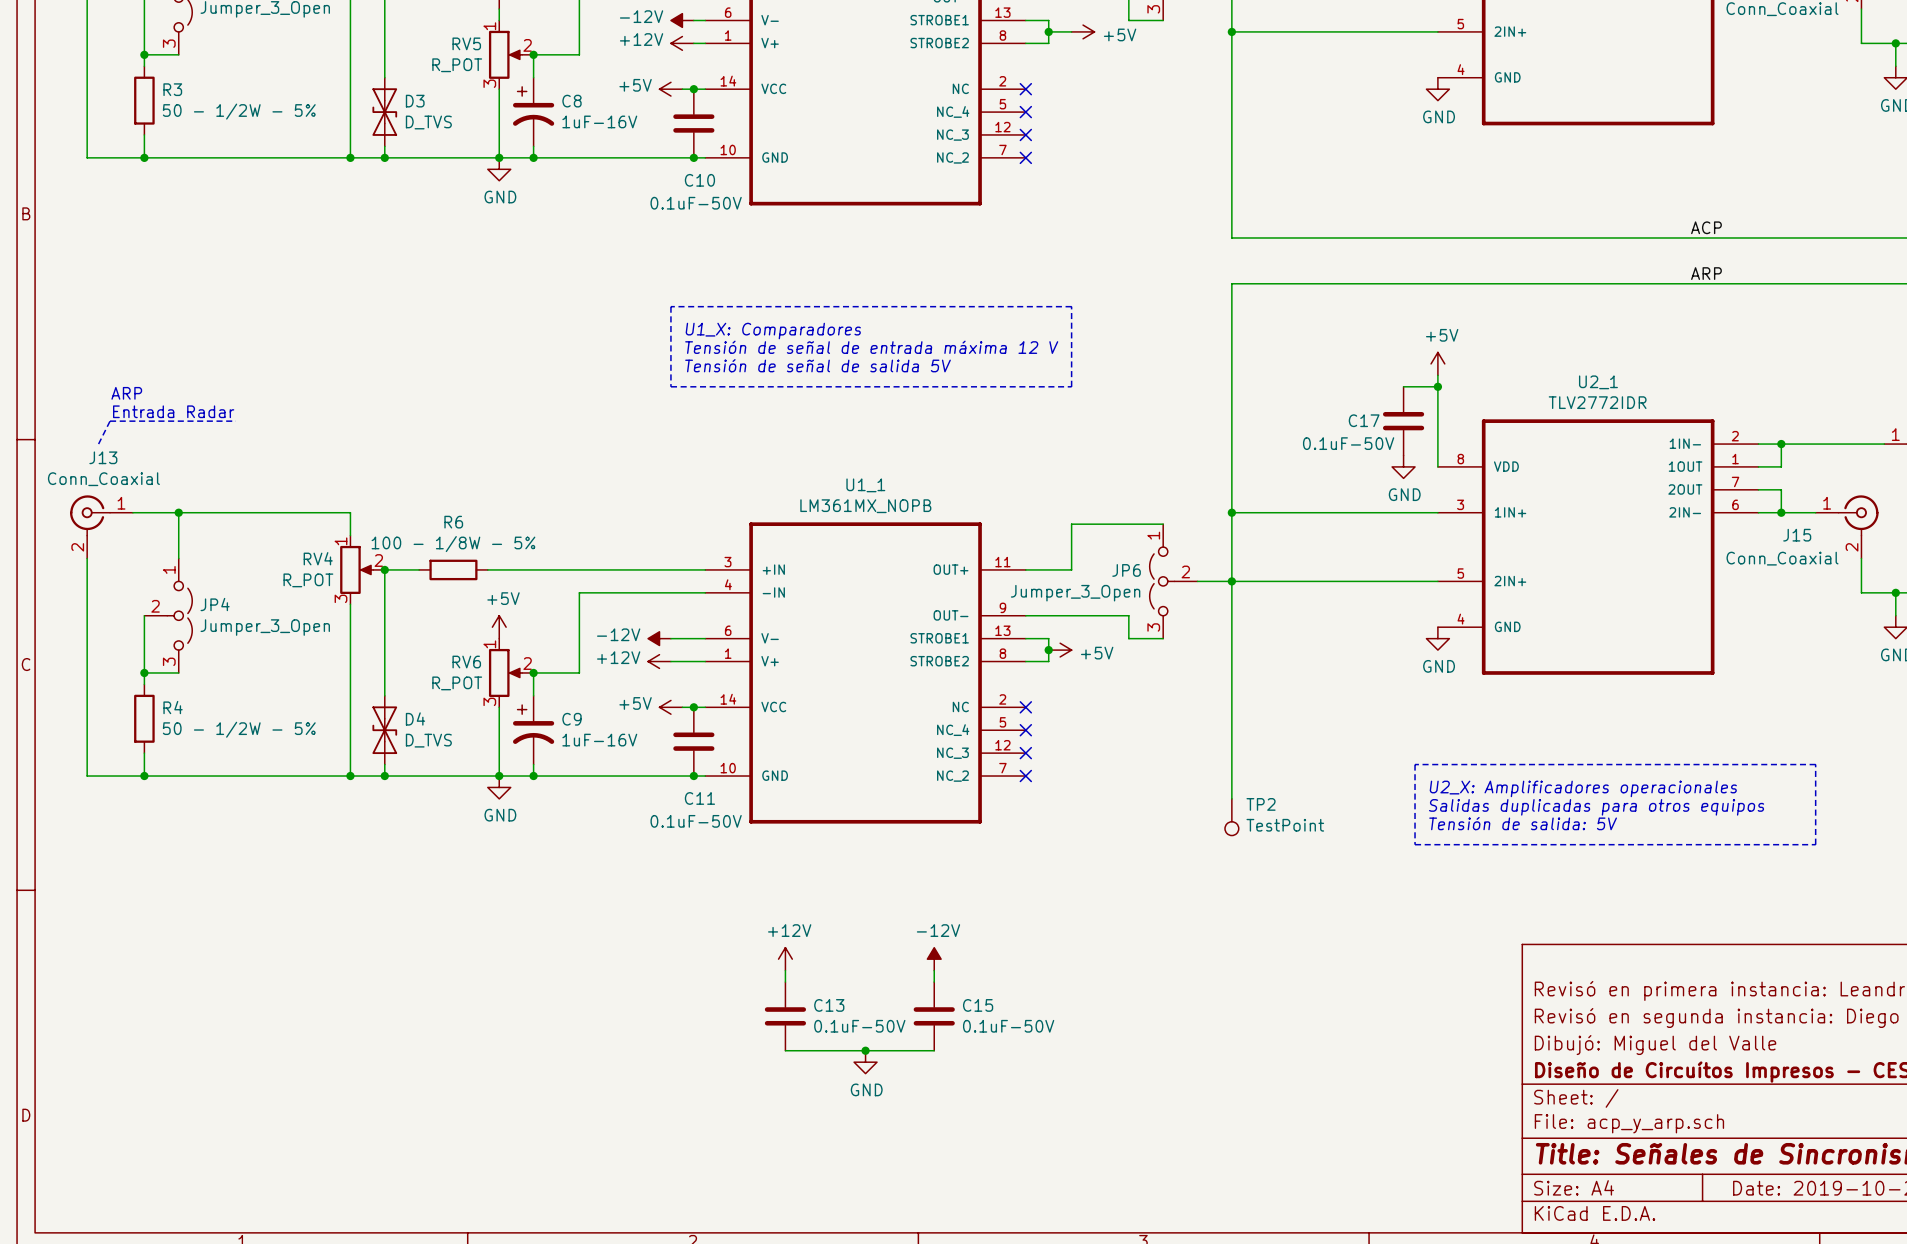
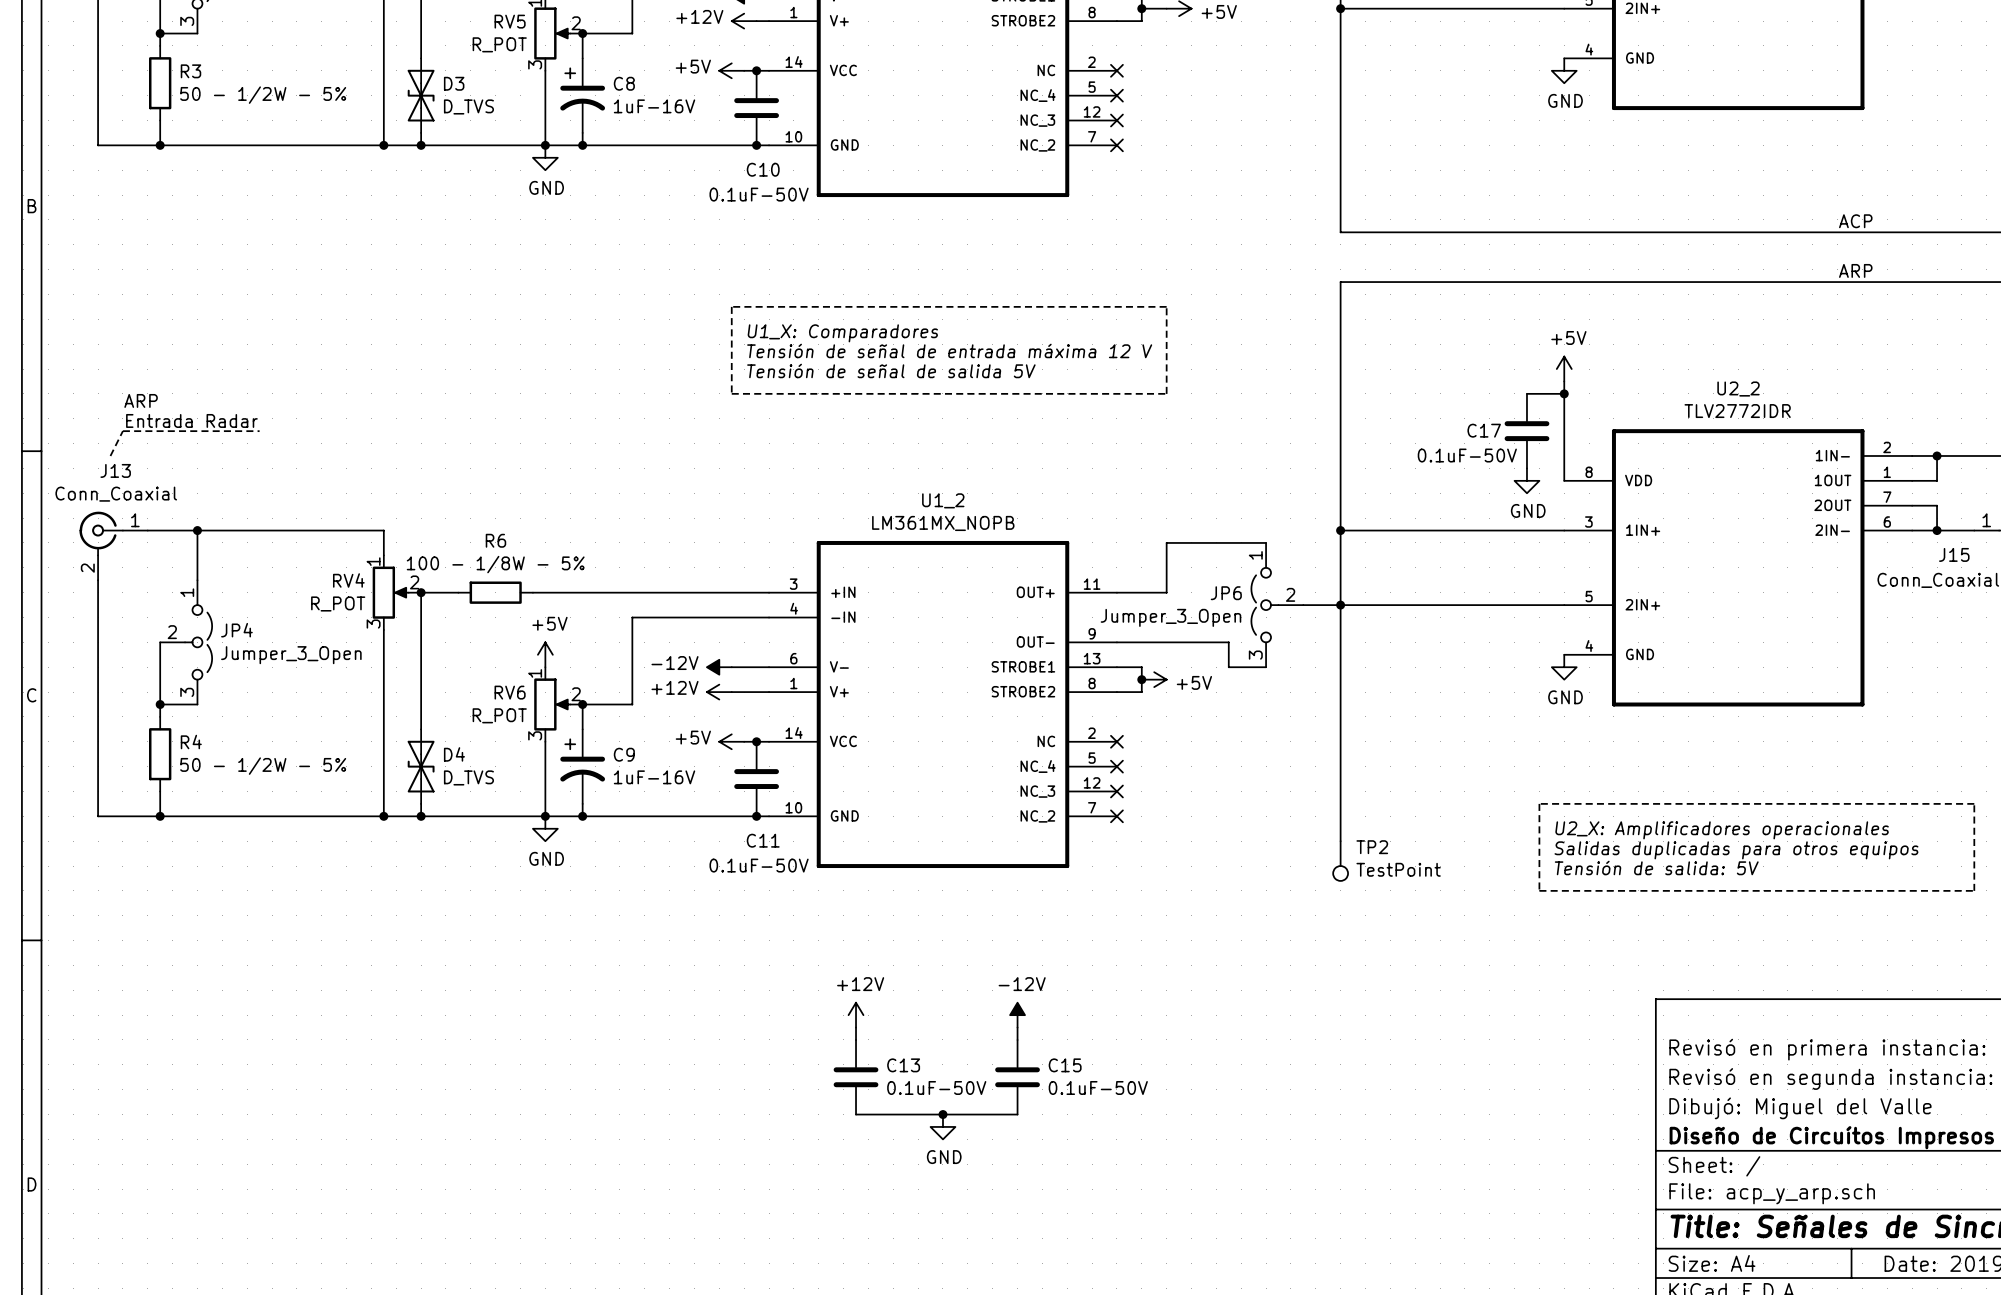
U2_1 name: U2_1 (1598, 382) -> U2_2 (1738, 389)
U1_1 name: U1_1 (865, 485) -> U1_2 (943, 500)

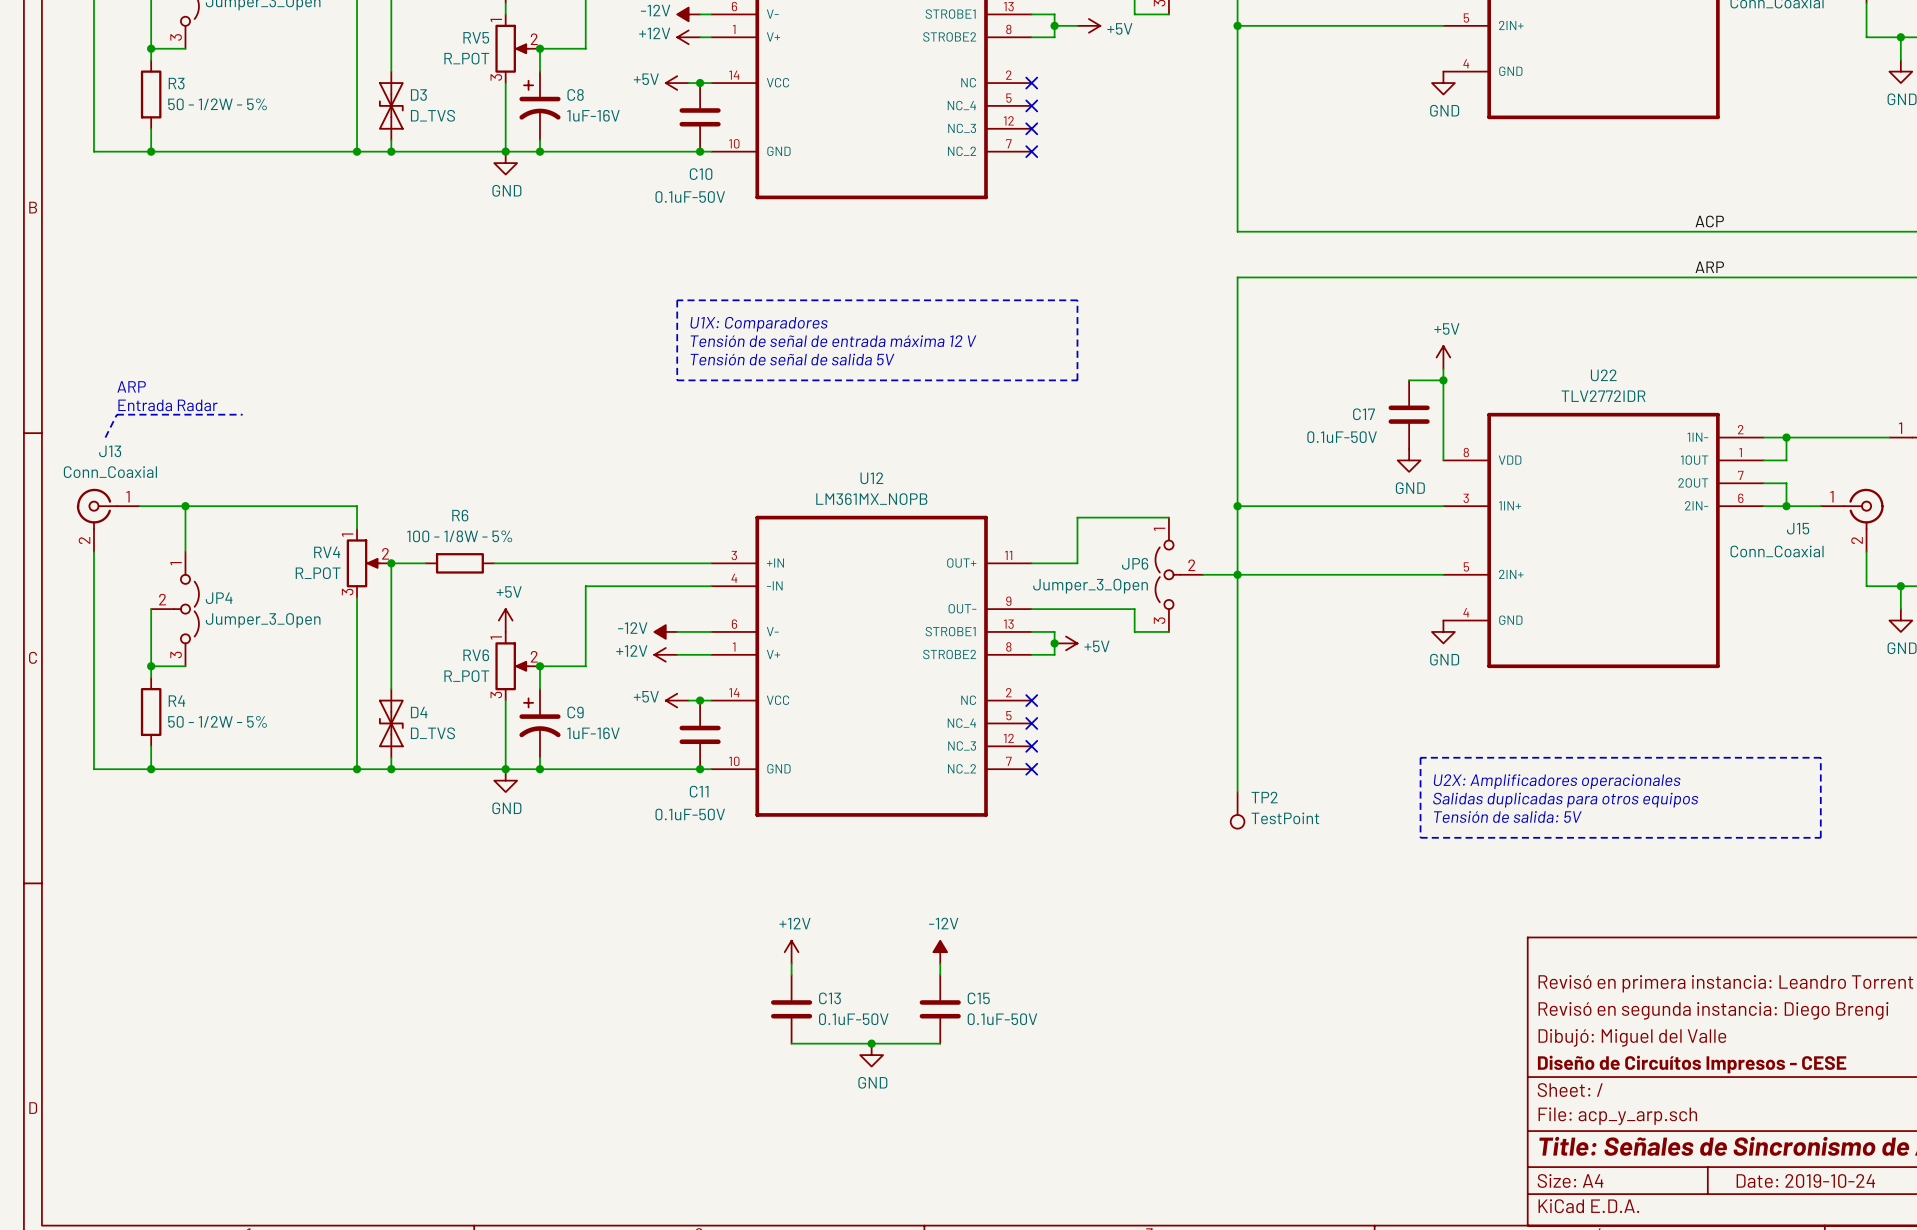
text: U1_X: Comparadores (842, 333) -> U1X: Comparadores (759, 324)
U2_2 name: U2_2 (1738, 389) -> U22 (1603, 375)
U1_2 name: U1_2 (943, 500) -> U12 (871, 478)
text: U2_X: Amplificadores operacionales (1722, 830) -> U2X: Amplificadores operacionales (1557, 781)

